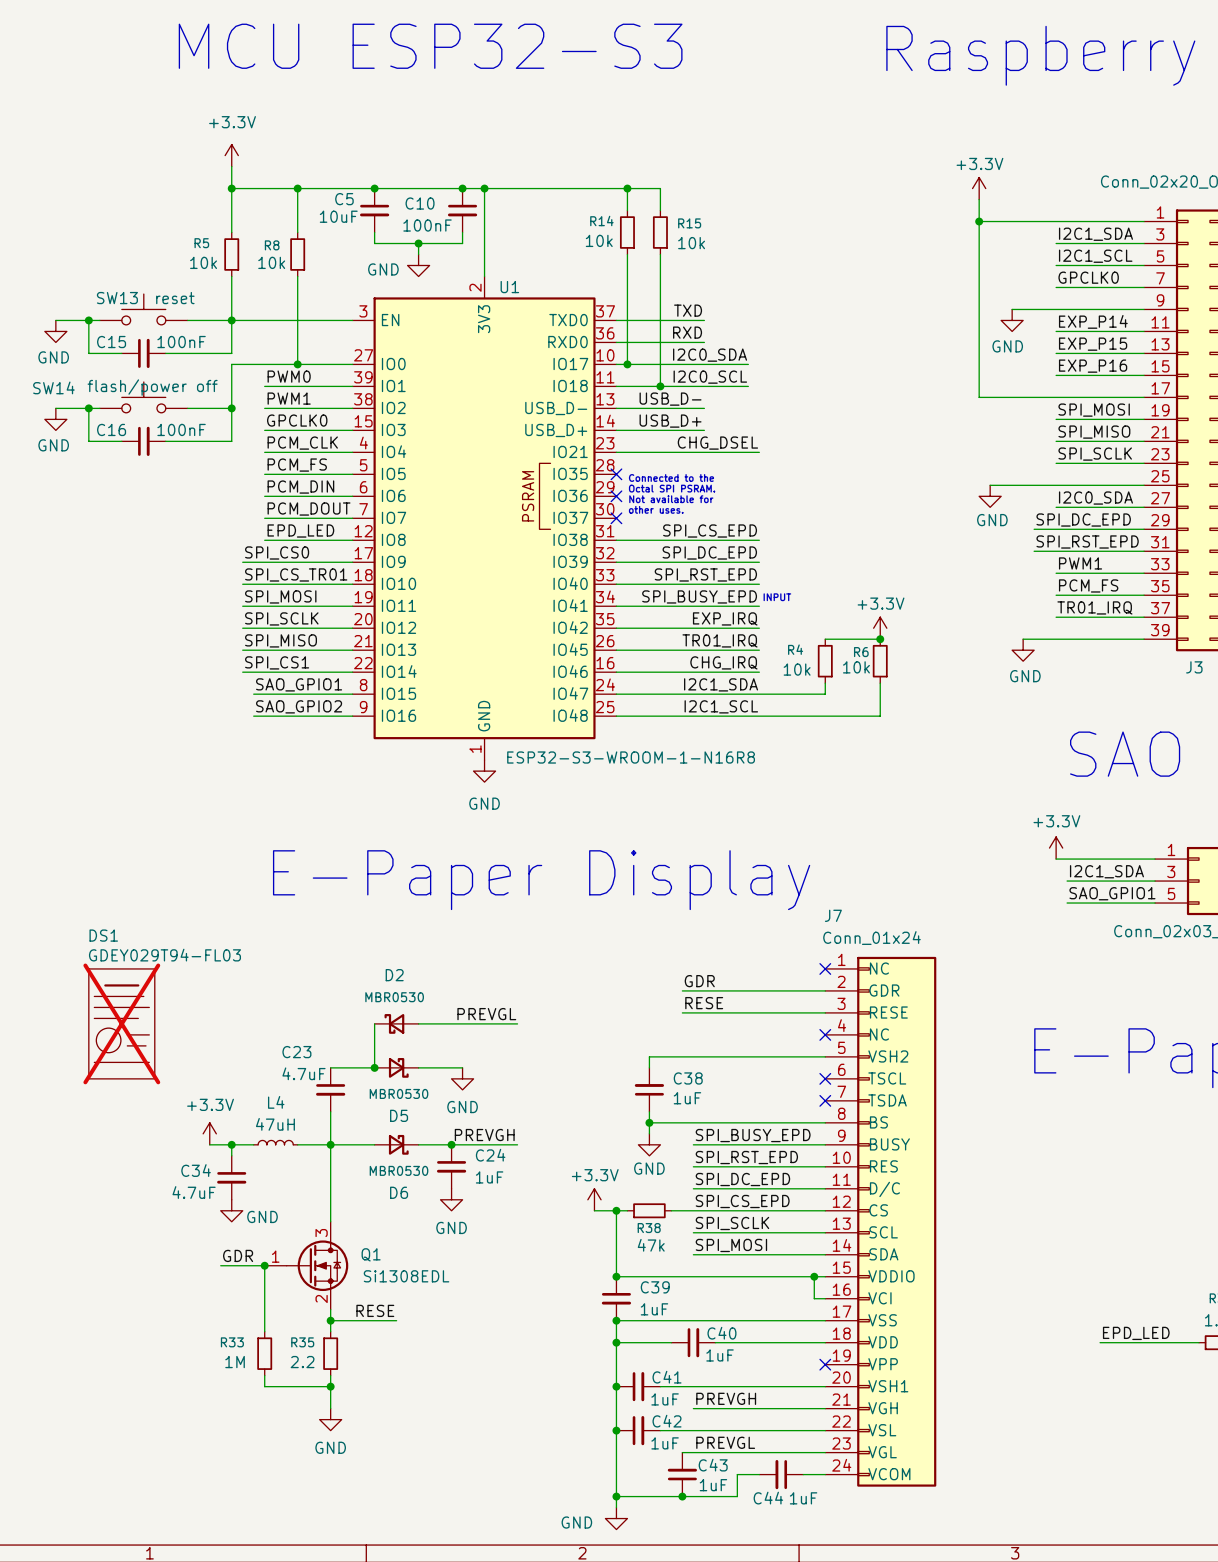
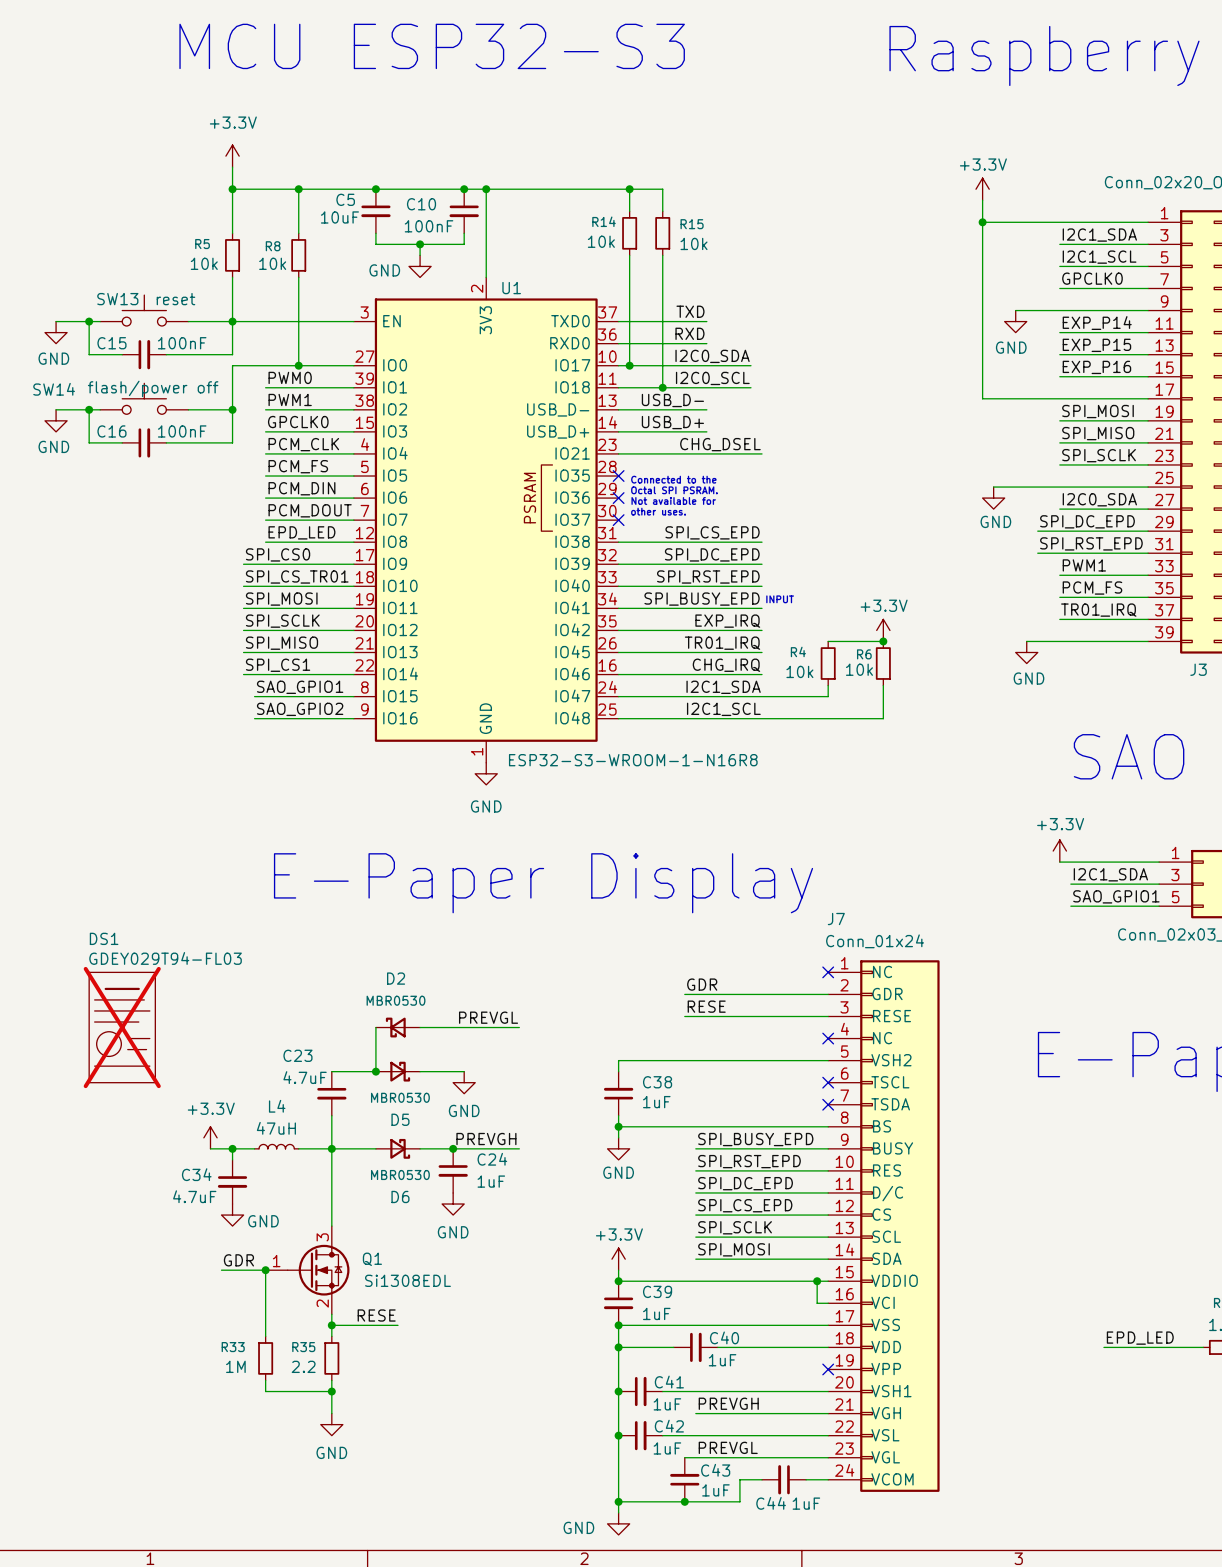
wire: (649, 1056) (649, 1067) -> (651, 1060) (618, 1060) (618, 1071)
C38 position: (649, 1089) -> (618, 1093)
wire: (649, 1111) (649, 1133) -> (618, 1115) (618, 1137)
junction position: (649, 1122) -> (618, 1126)
power symbol position: GND (649, 1144) -> GND (618, 1148)
power symbol position: +3.3V (594, 1199) -> +3.3V (618, 1259)
wire: (594, 1210) (627, 1210) -> (618, 1126) (651, 1126)
wire: (616, 1210) (616, 1265) -> none
junction: (616, 1210) -> none
R38: 47k (649, 1210) -> none
wire: (671, 1210) (693, 1210) -> none

